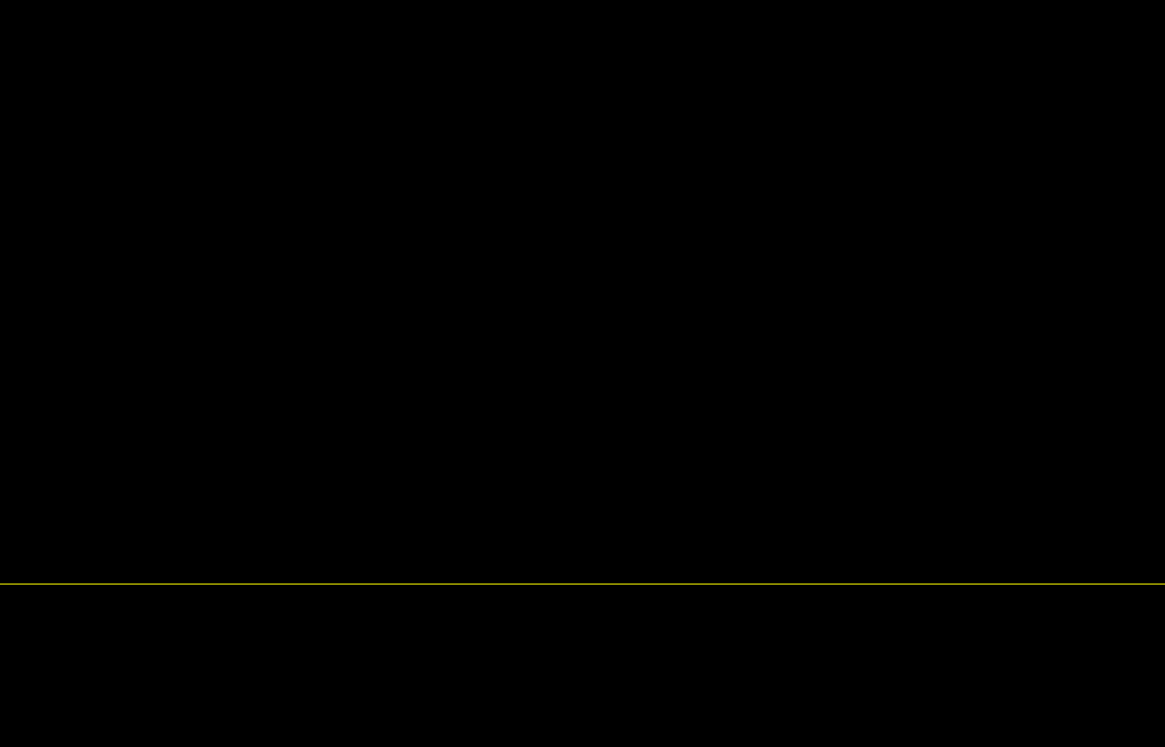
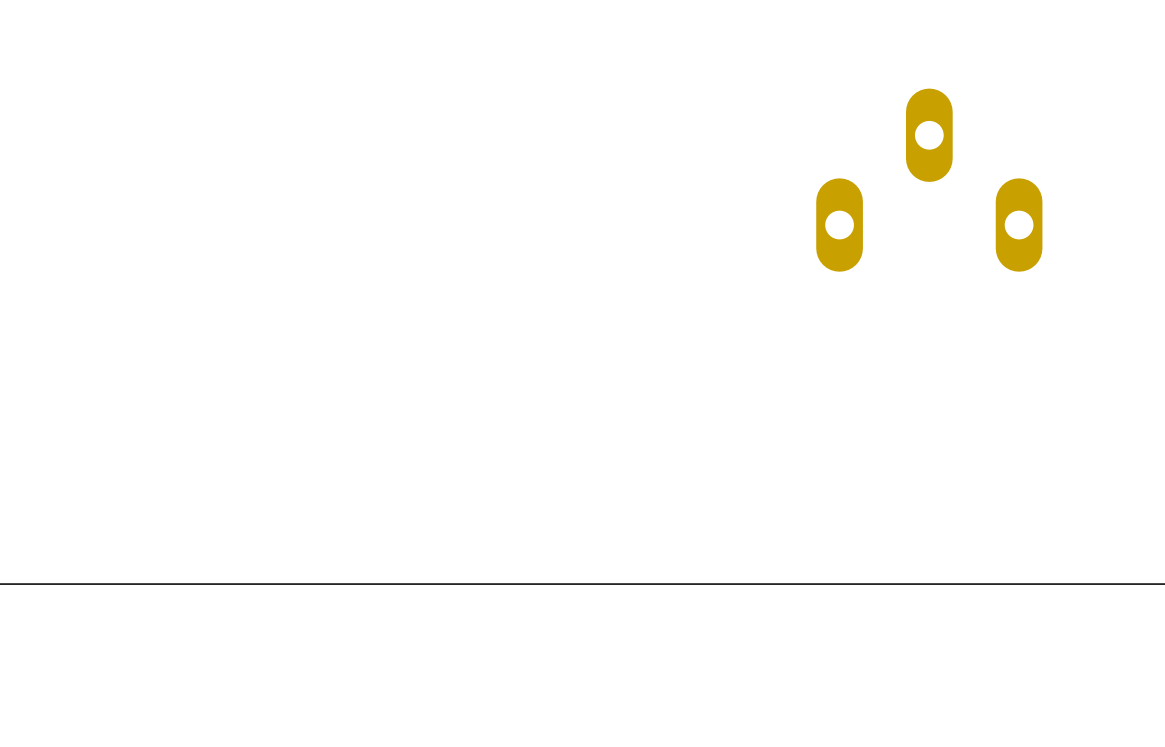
part: none -> (929, 180)

